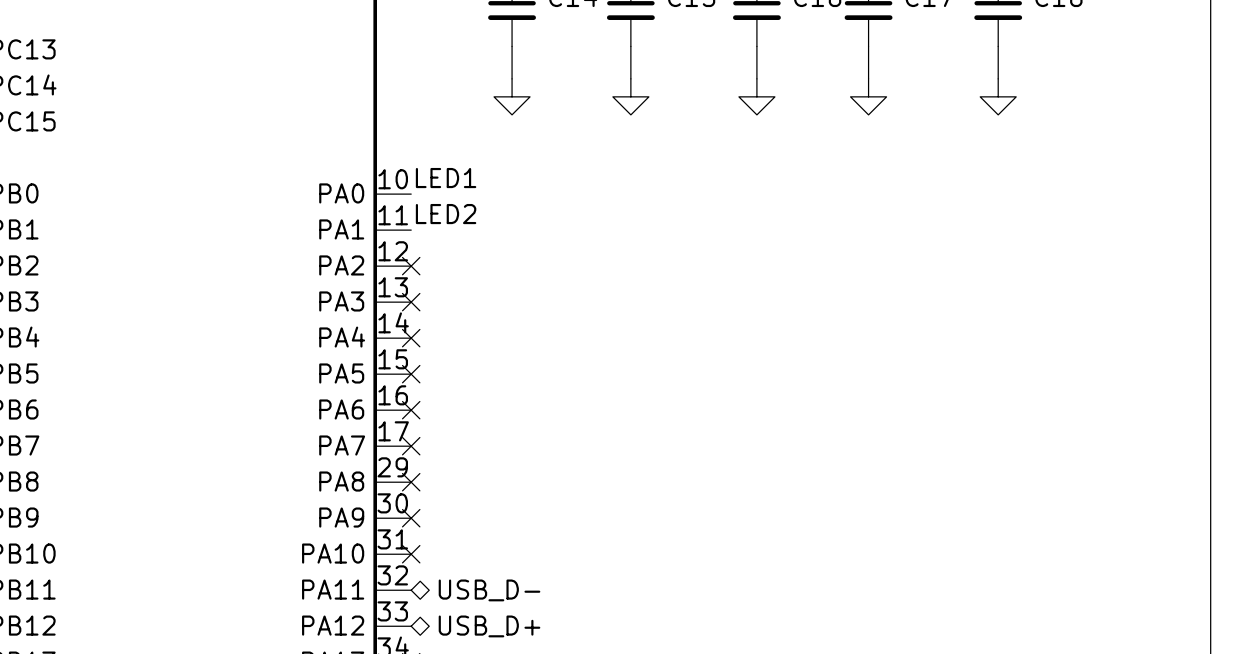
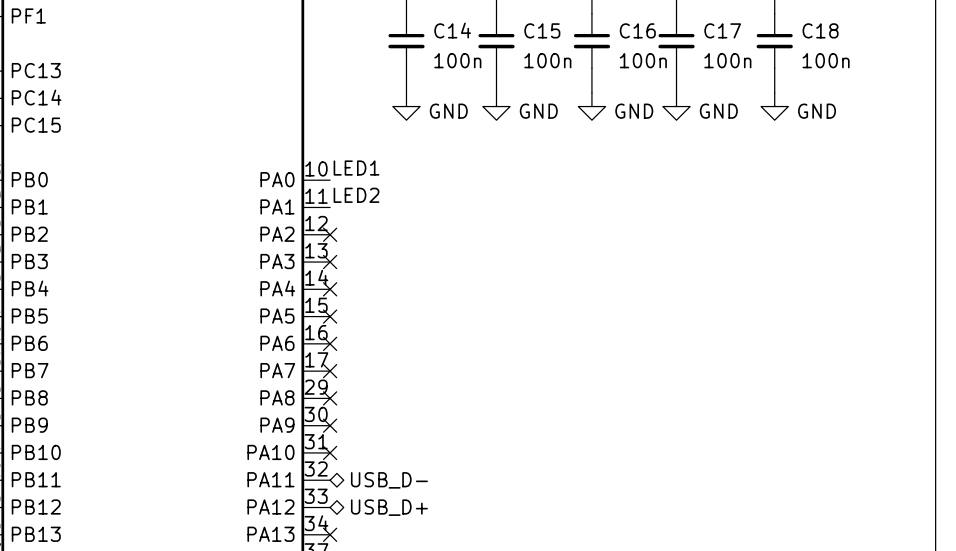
C14 value: none -> 100n (457, 60)
C15 value: none -> 100n (547, 60)
C16 value: none -> 100n (643, 60)
C17 value: none -> 100n (727, 60)
C18 value: none -> 100n (826, 60)
power symbol text: none -> GND (448, 111)
power symbol text: none -> GND (538, 111)
power symbol text: none -> GND (634, 111)
power symbol text: none -> GND (718, 111)
power symbol text: none -> GND (817, 111)

